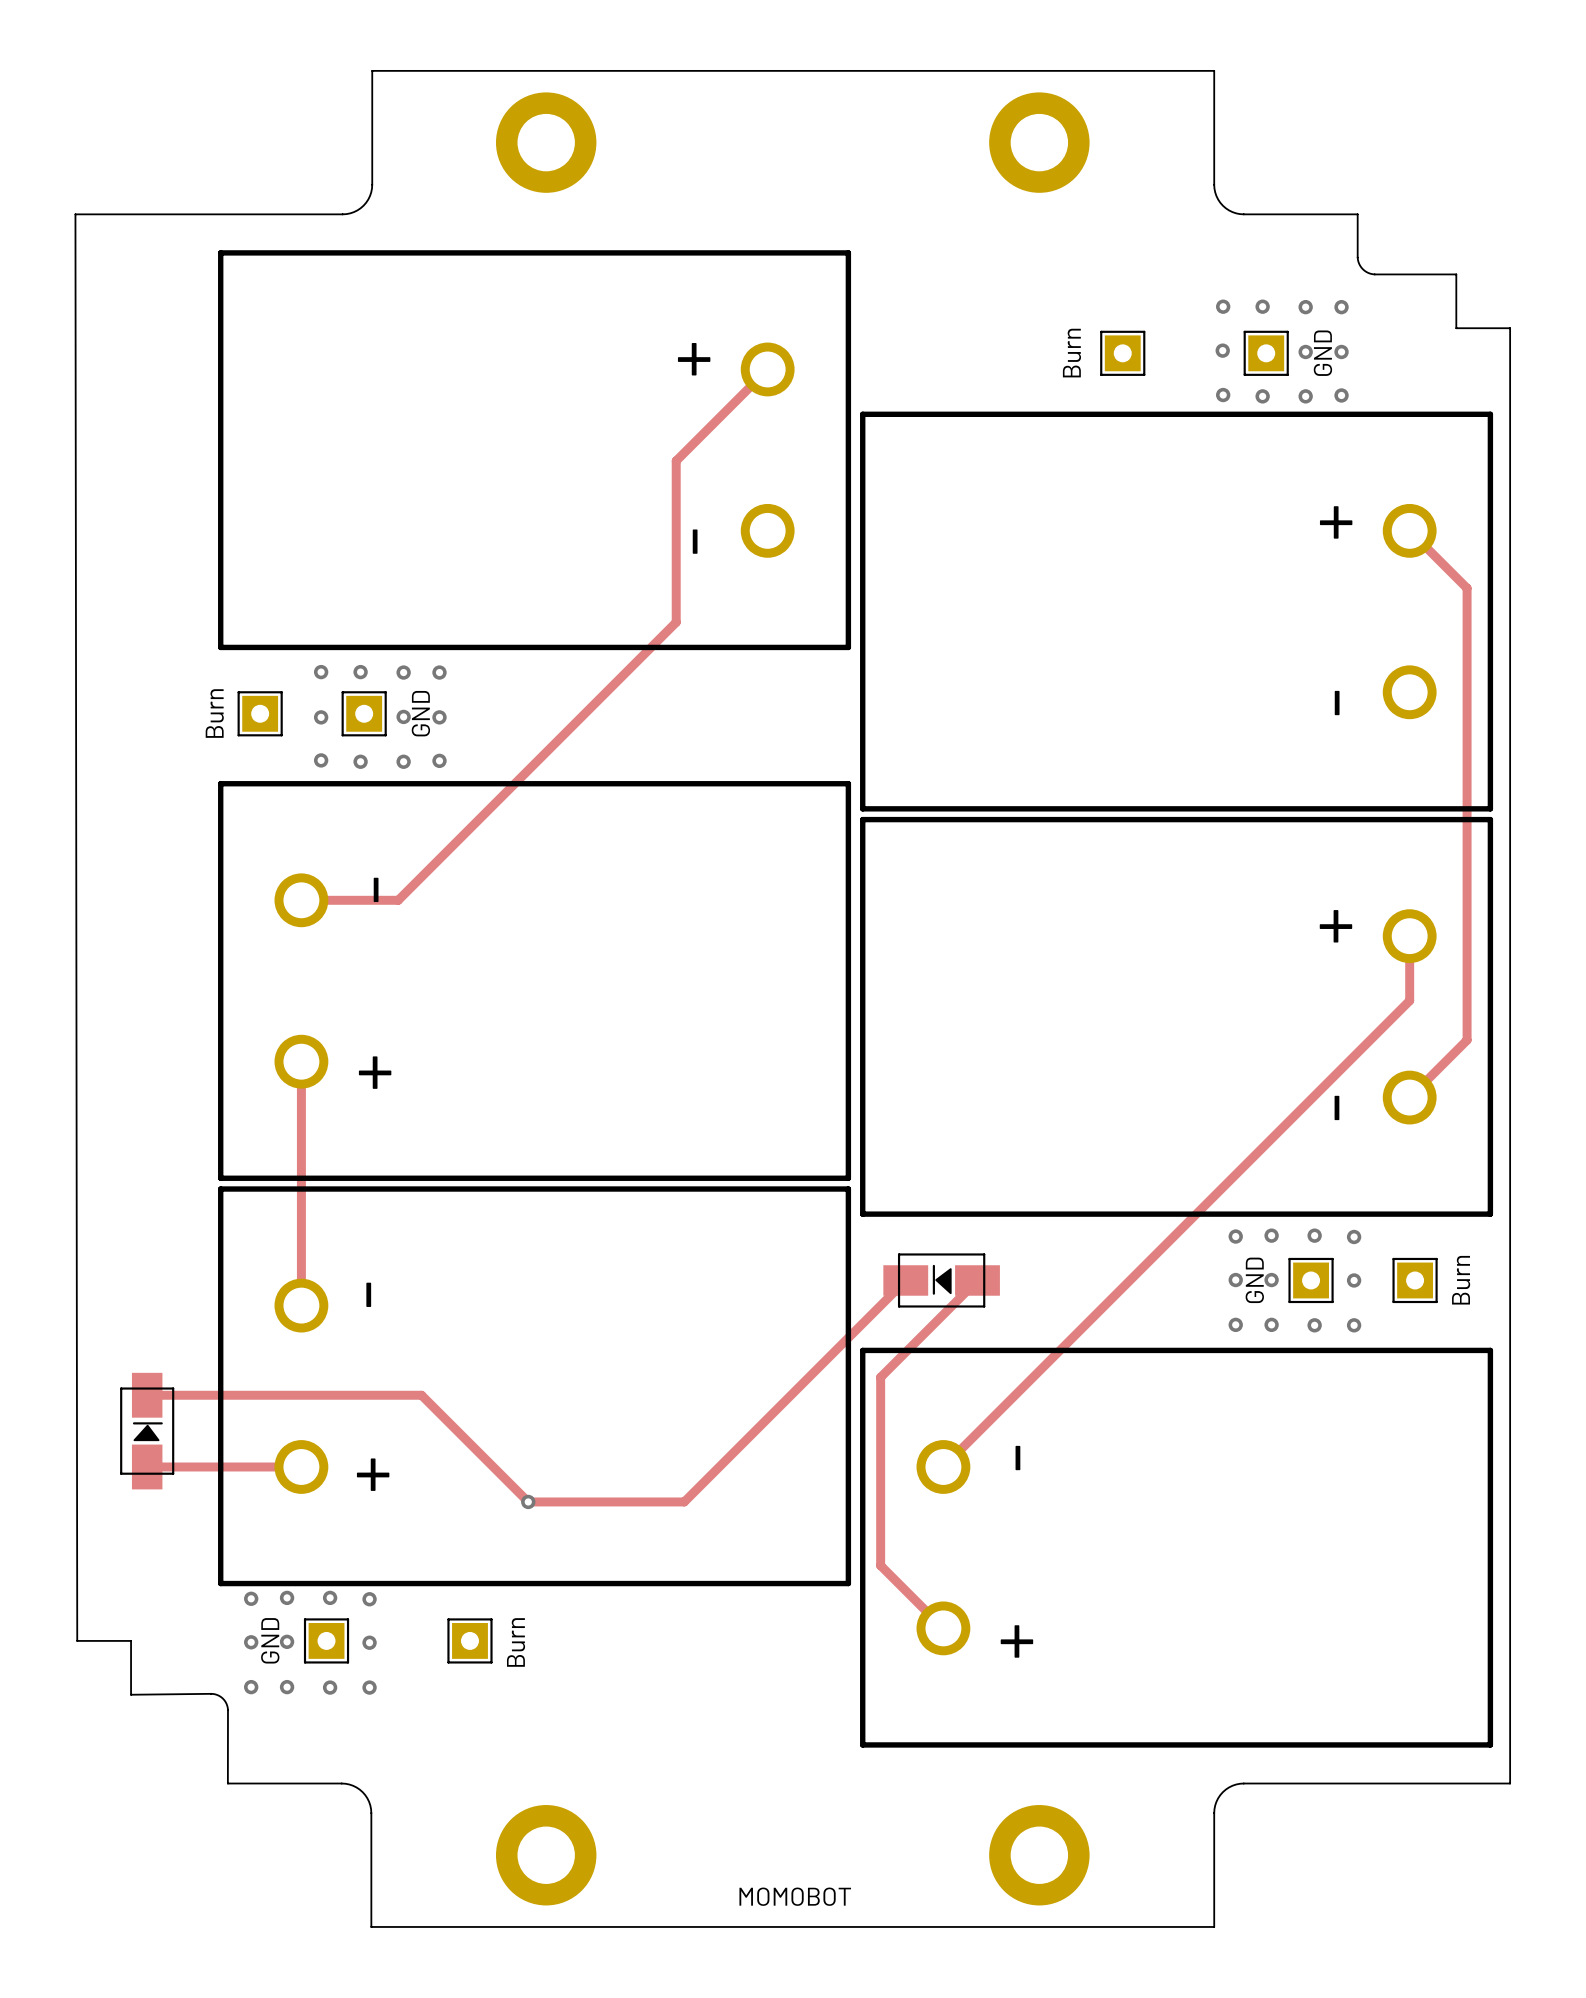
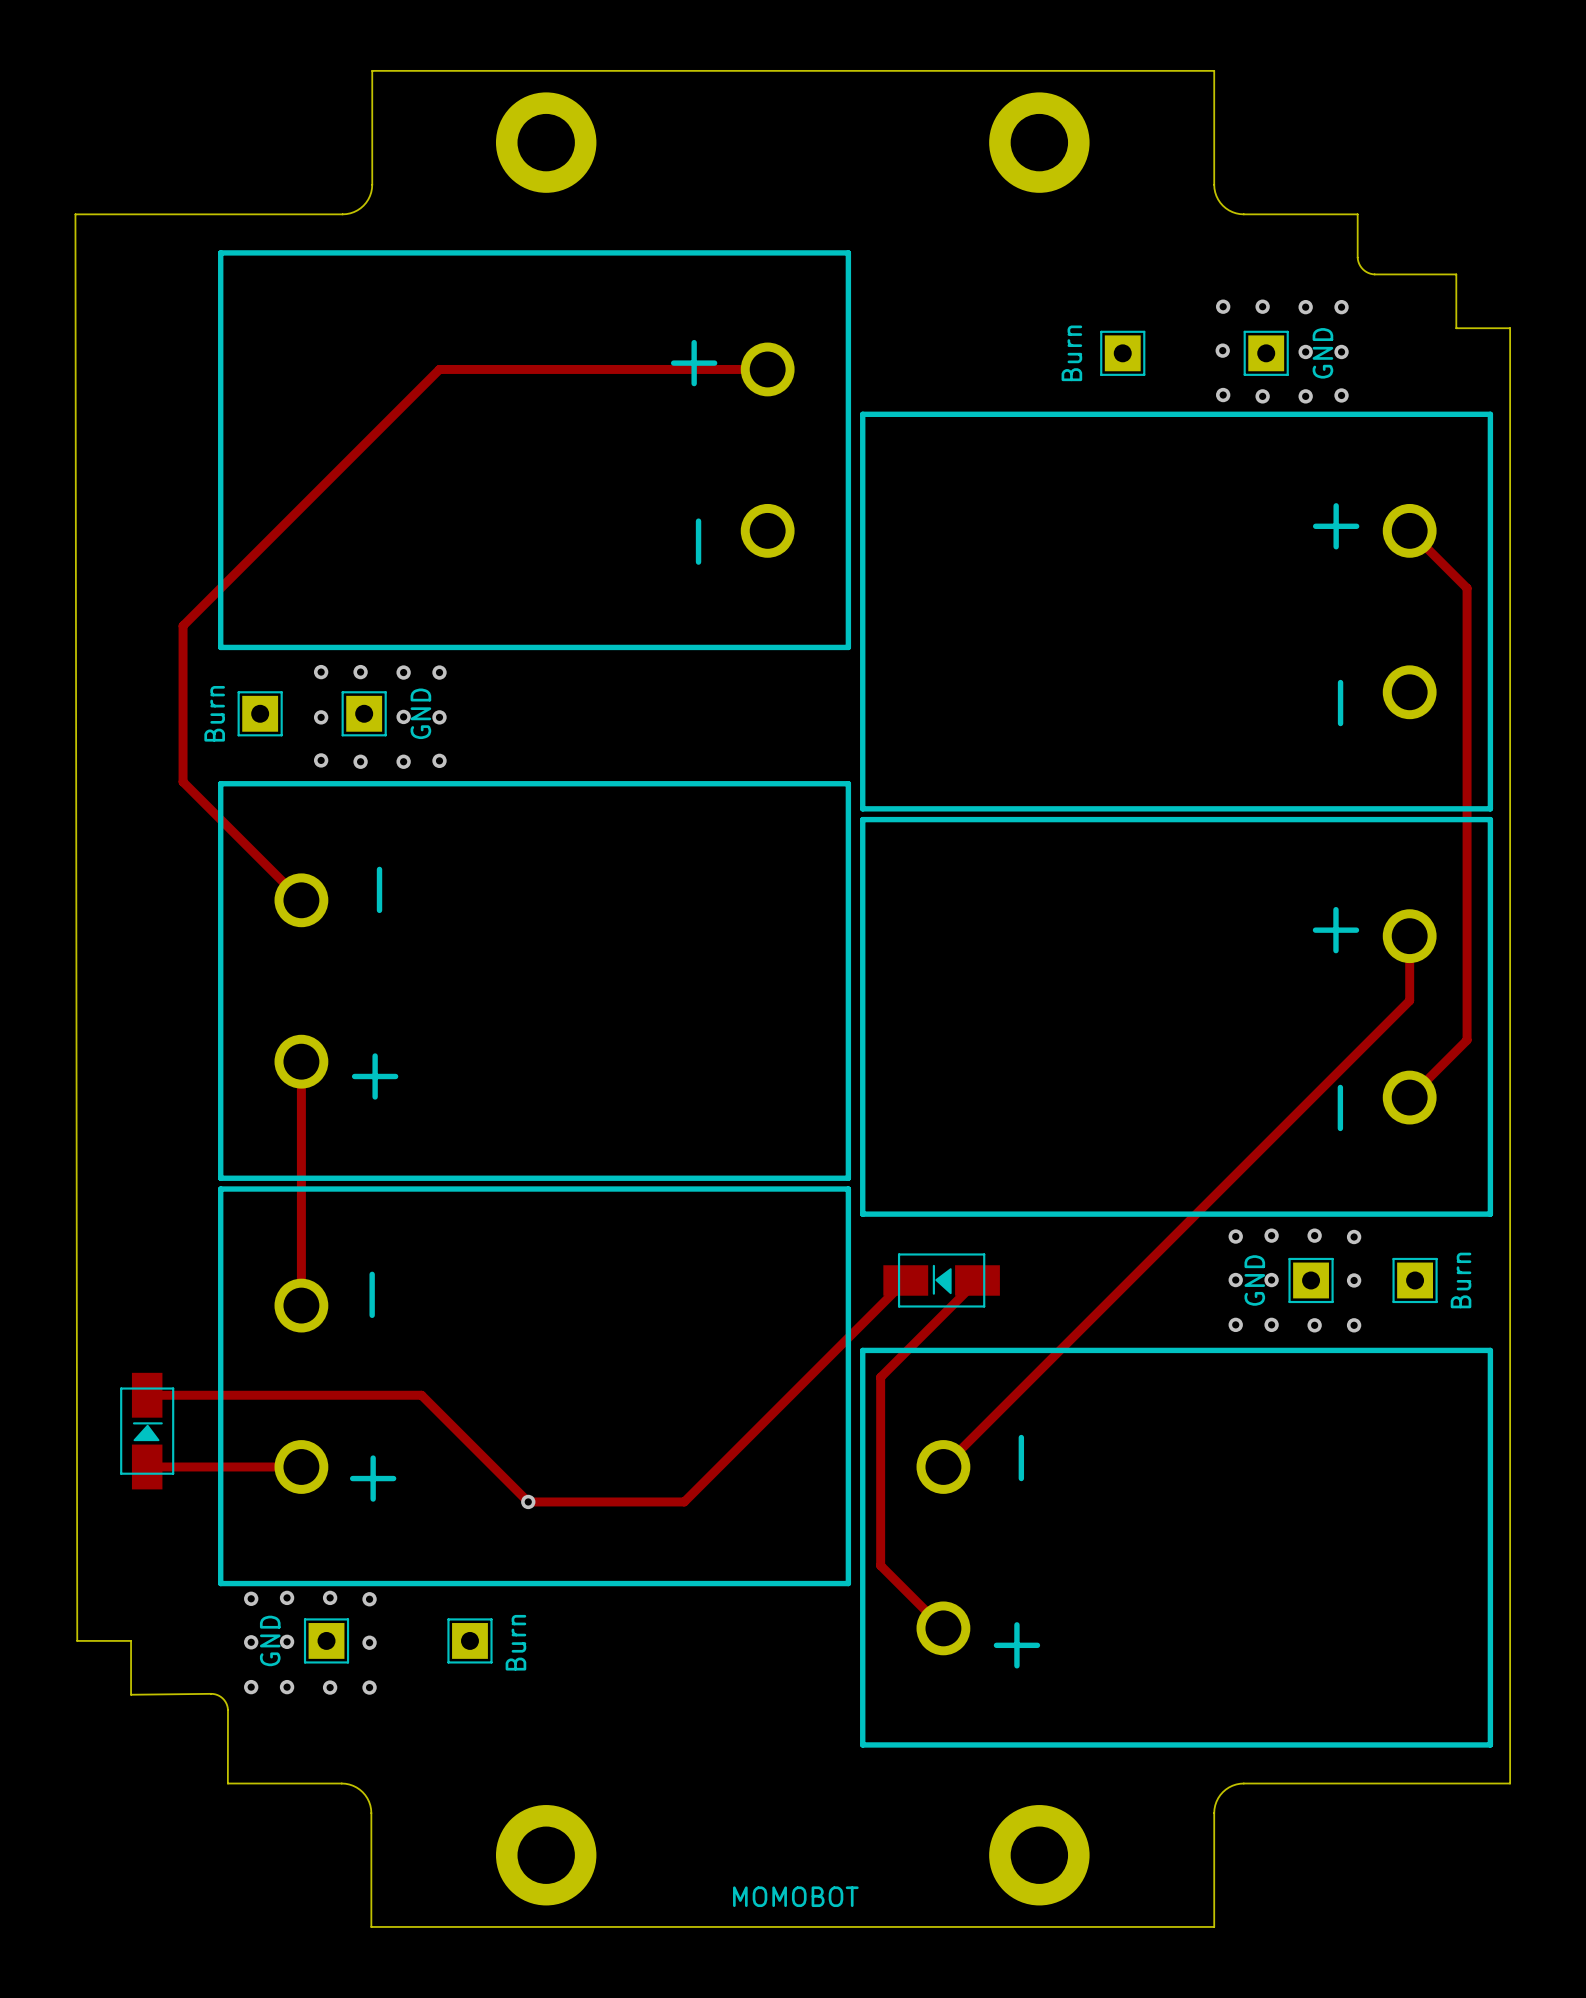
track: (767, 369) (676, 460) (676, 622) (398, 900) (301, 900) -> (767, 369) (439, 369) (183, 625) (183, 781) (301, 900)

